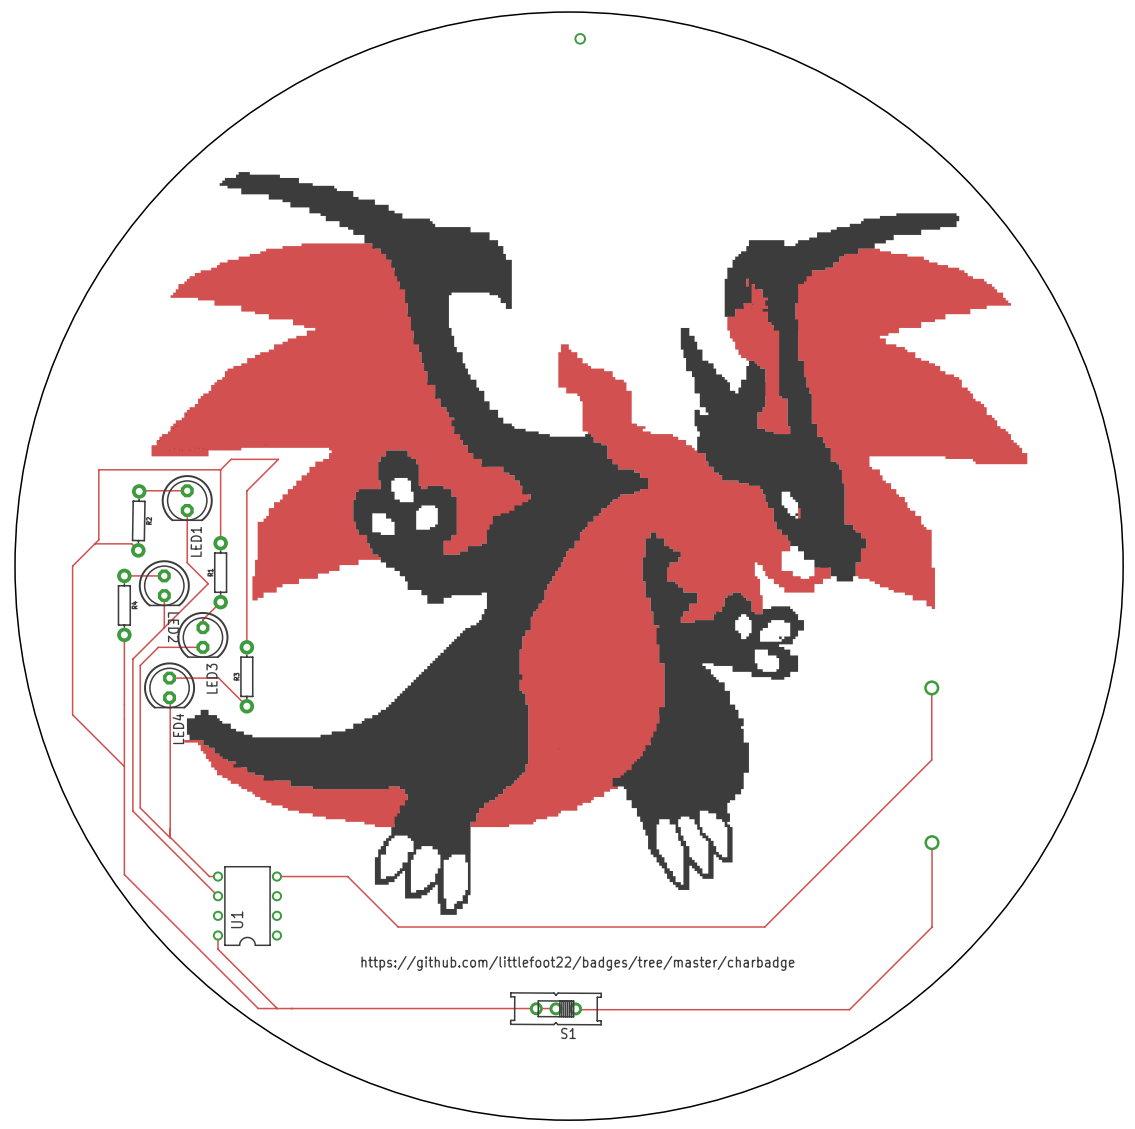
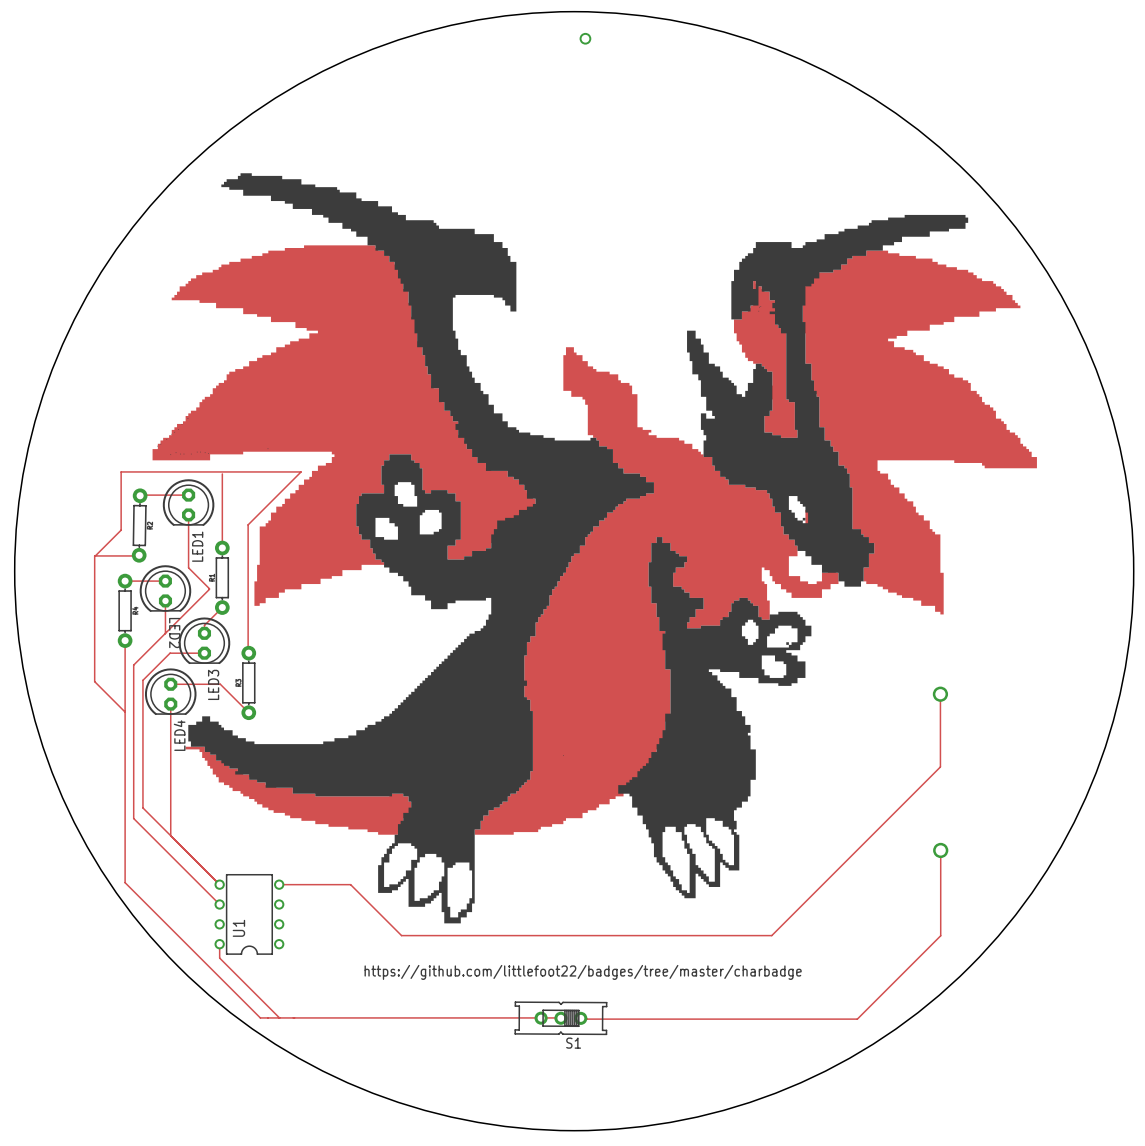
track: (94, 543) (131, 543) (138, 550) -> (125, 712) (94, 681) (94, 555) (139, 555)
track: (168, 647) (158, 647) (140, 665) (140, 807) (170, 837) (169, 697) -> (170, 835) (170, 704)
track: (246, 647) (246, 490) (278, 459) (231, 459) (220, 469) (98, 469) (98, 539) (72, 566) (72, 714) (124, 766) -> (248, 653) (248, 524) (301, 471) (121, 471) (121, 530) (95, 555)
track: (170, 837) (209, 876) (218, 876) -> (170, 653) (142, 680) (142, 807) (219, 884)

